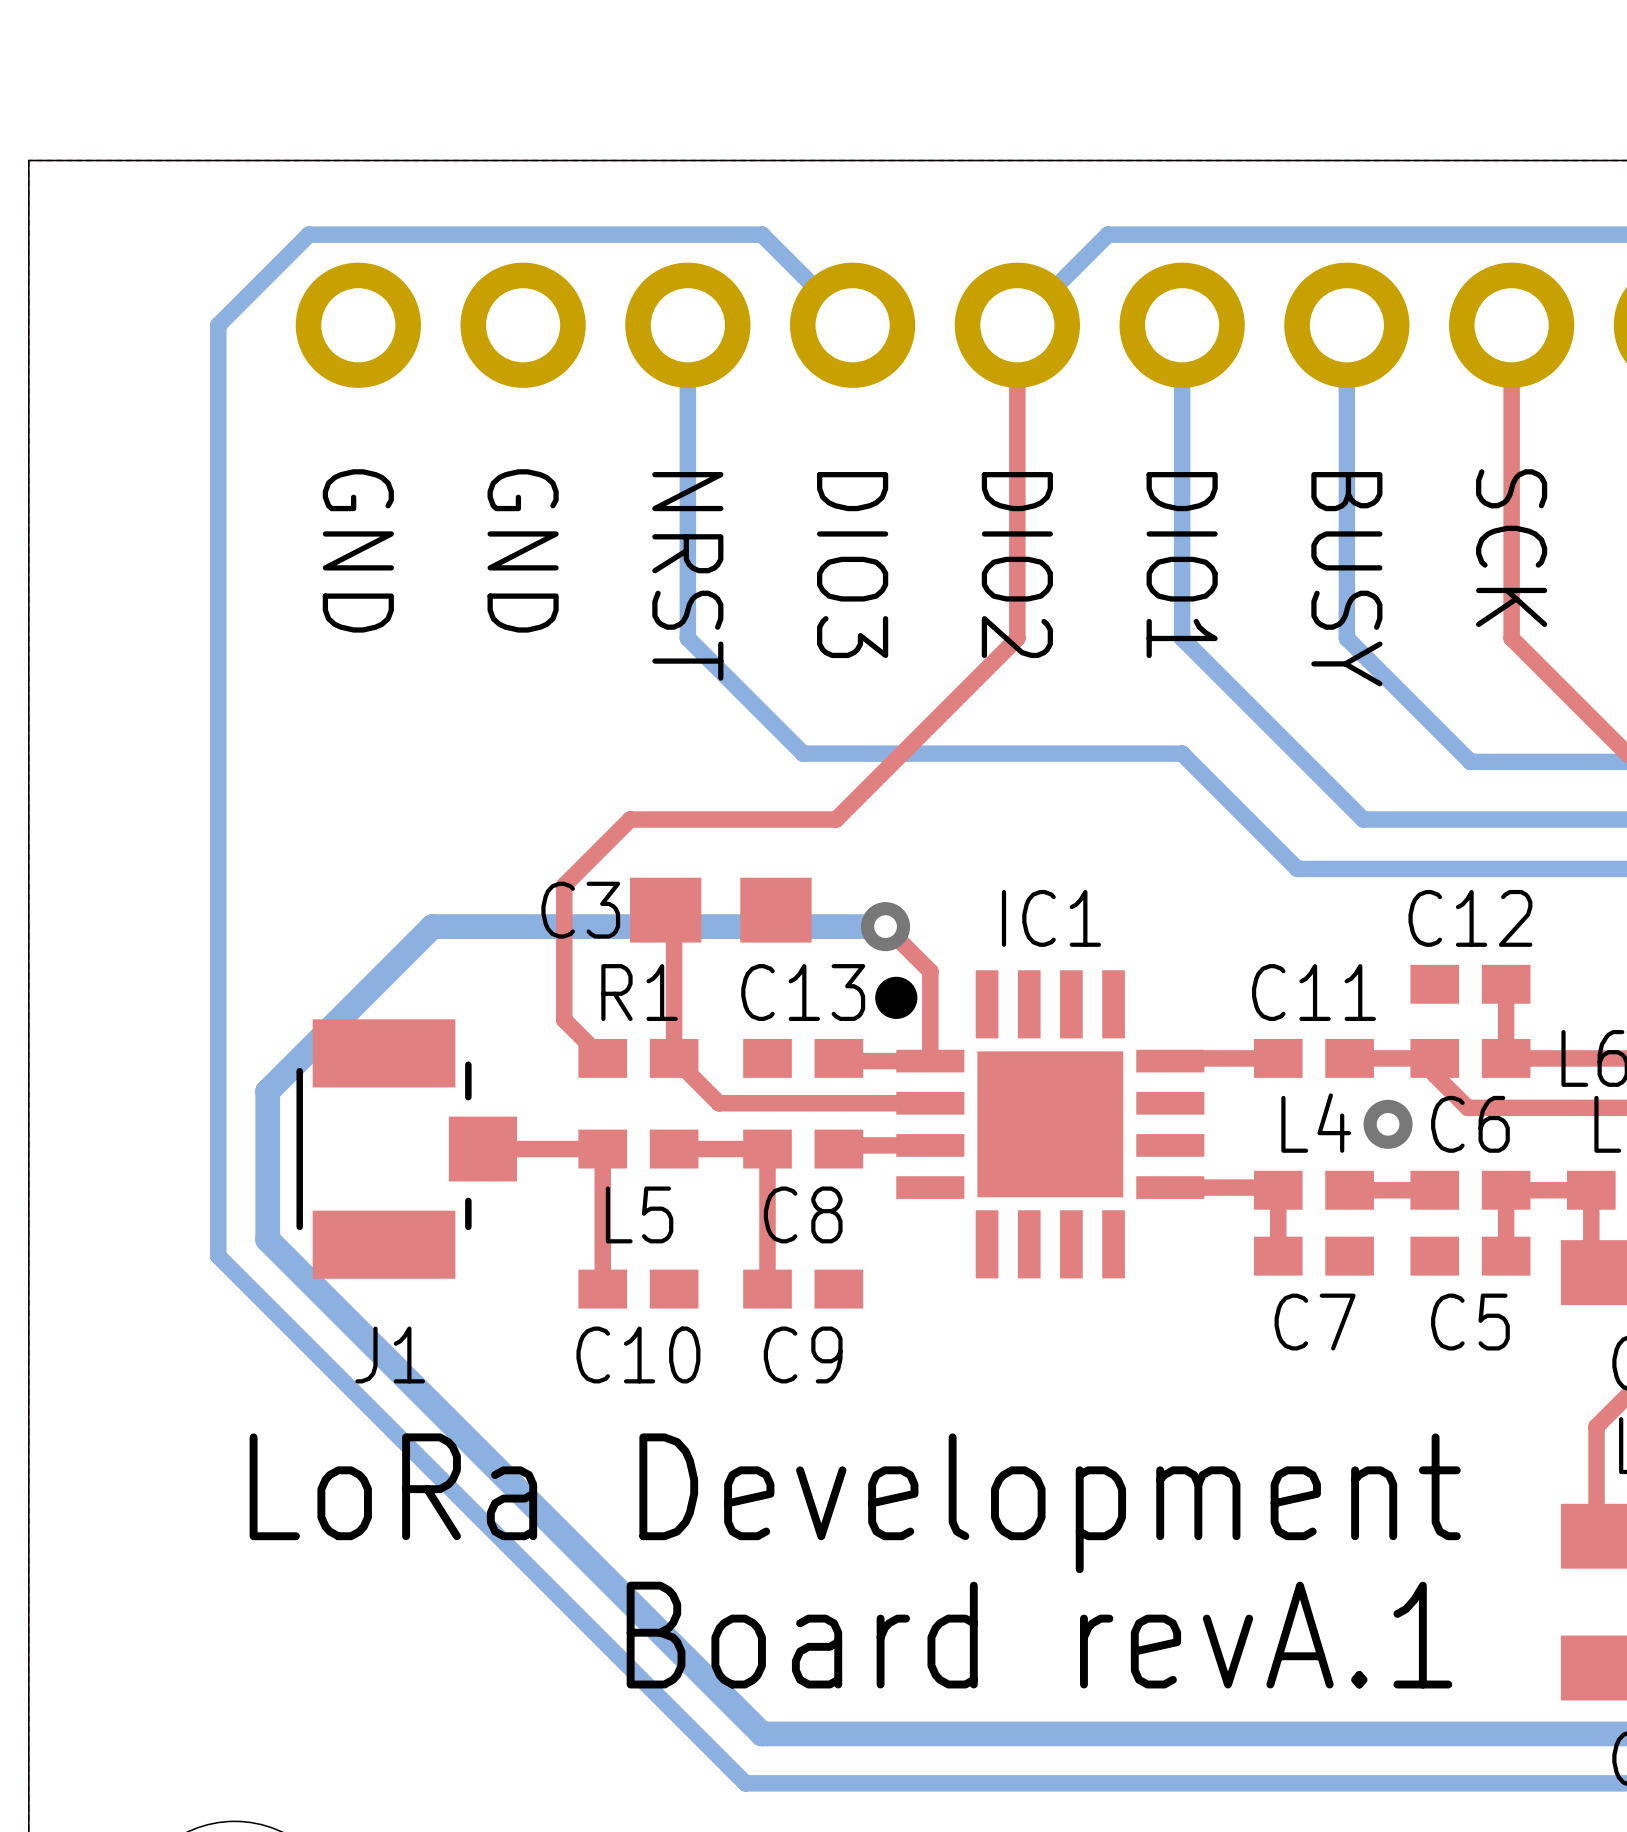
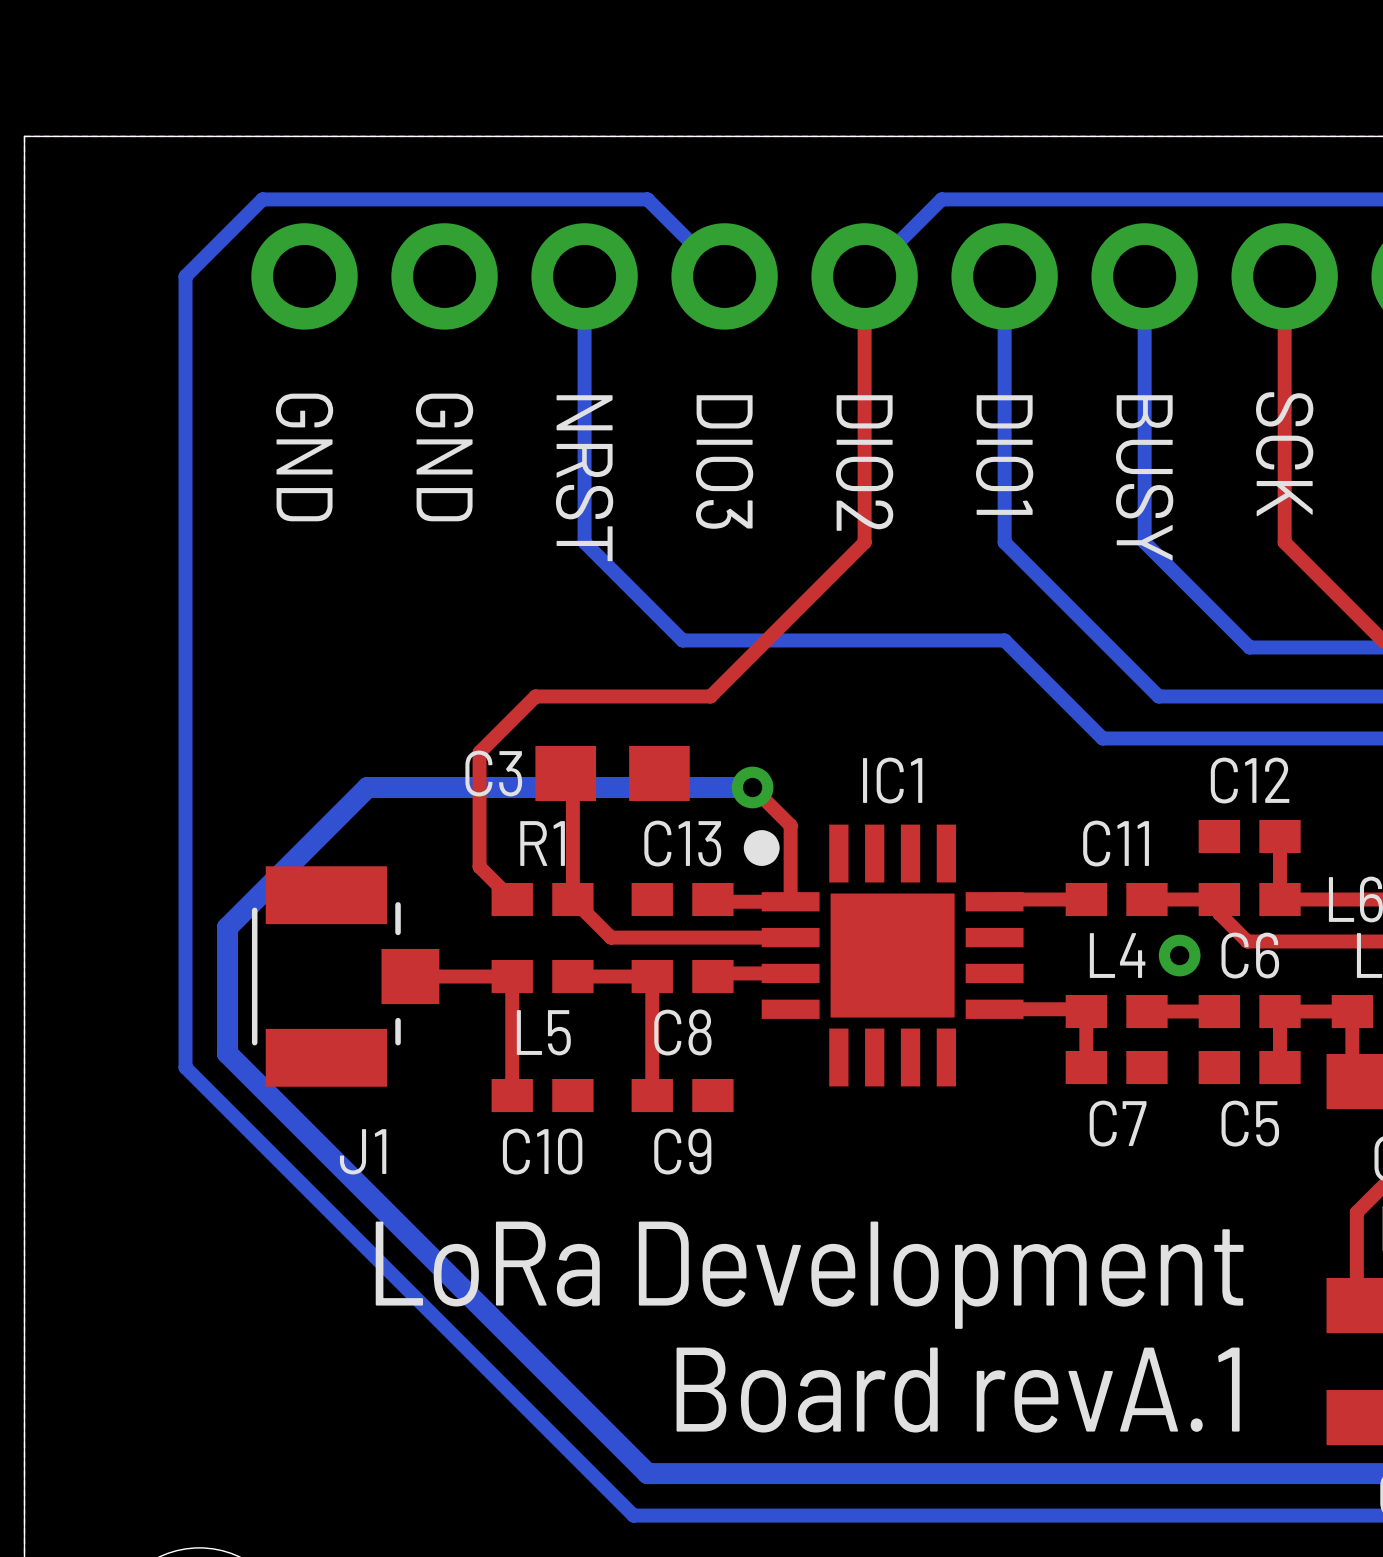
J1 name position: J1 (390, 1354) -> J1 (363, 1151)

